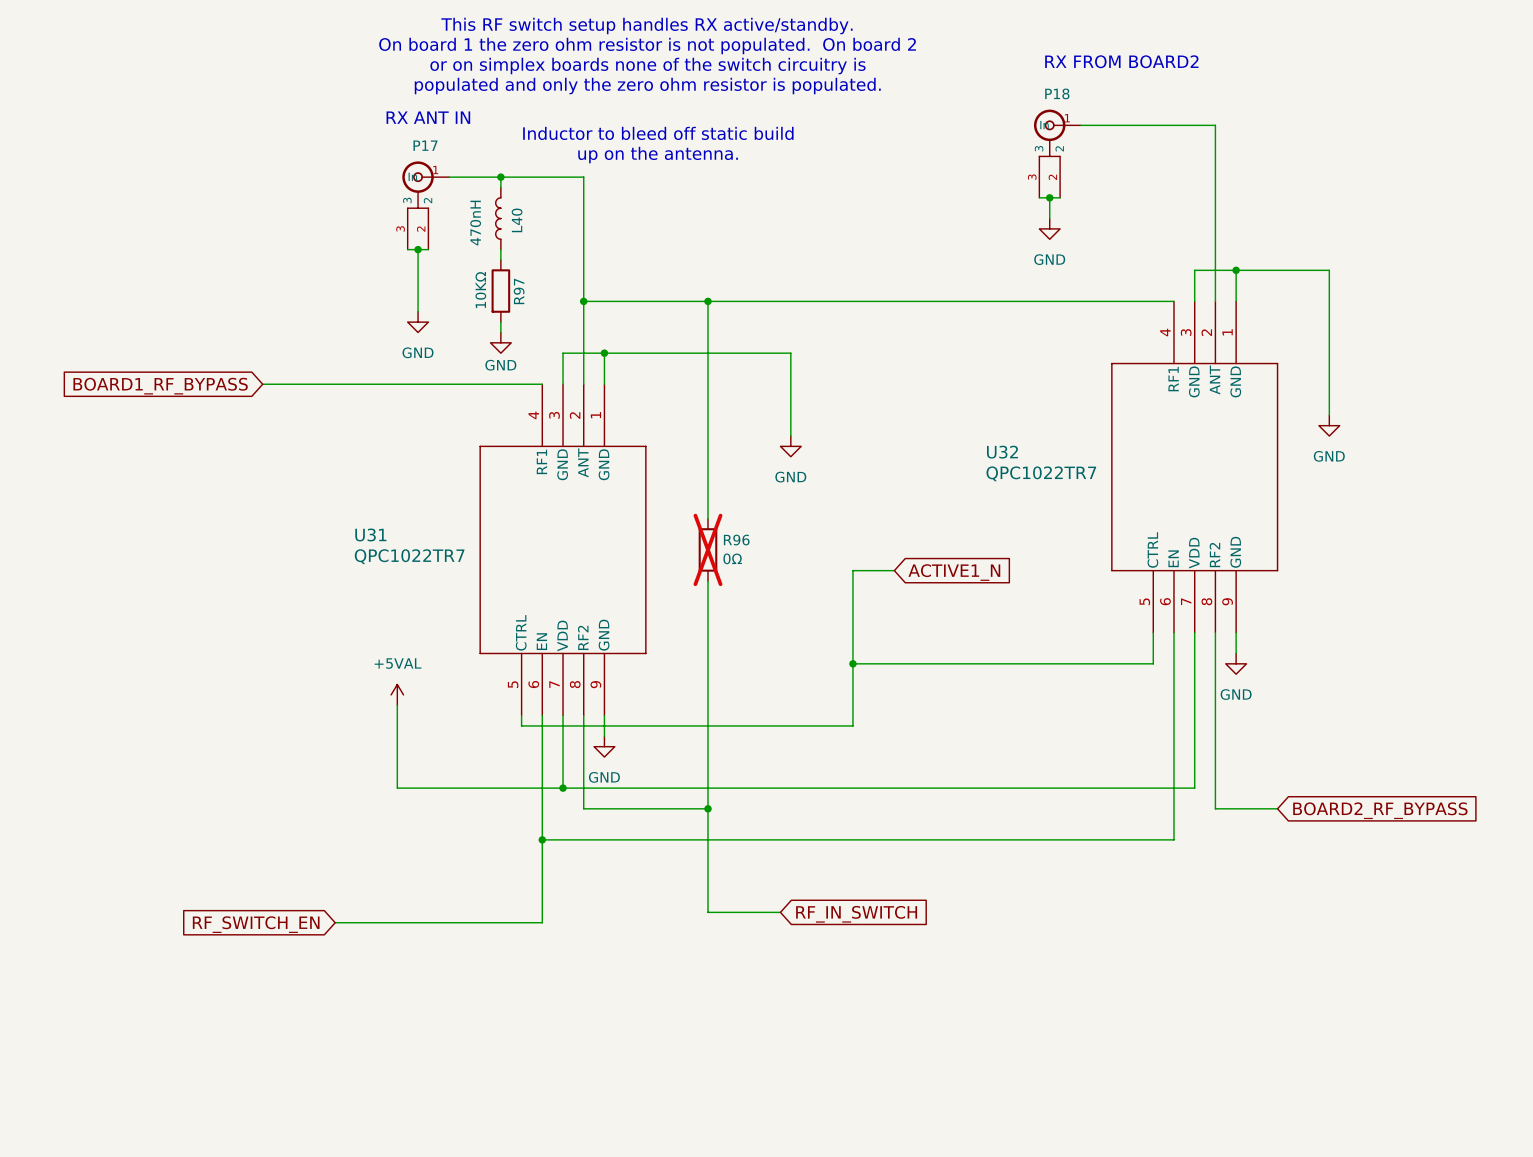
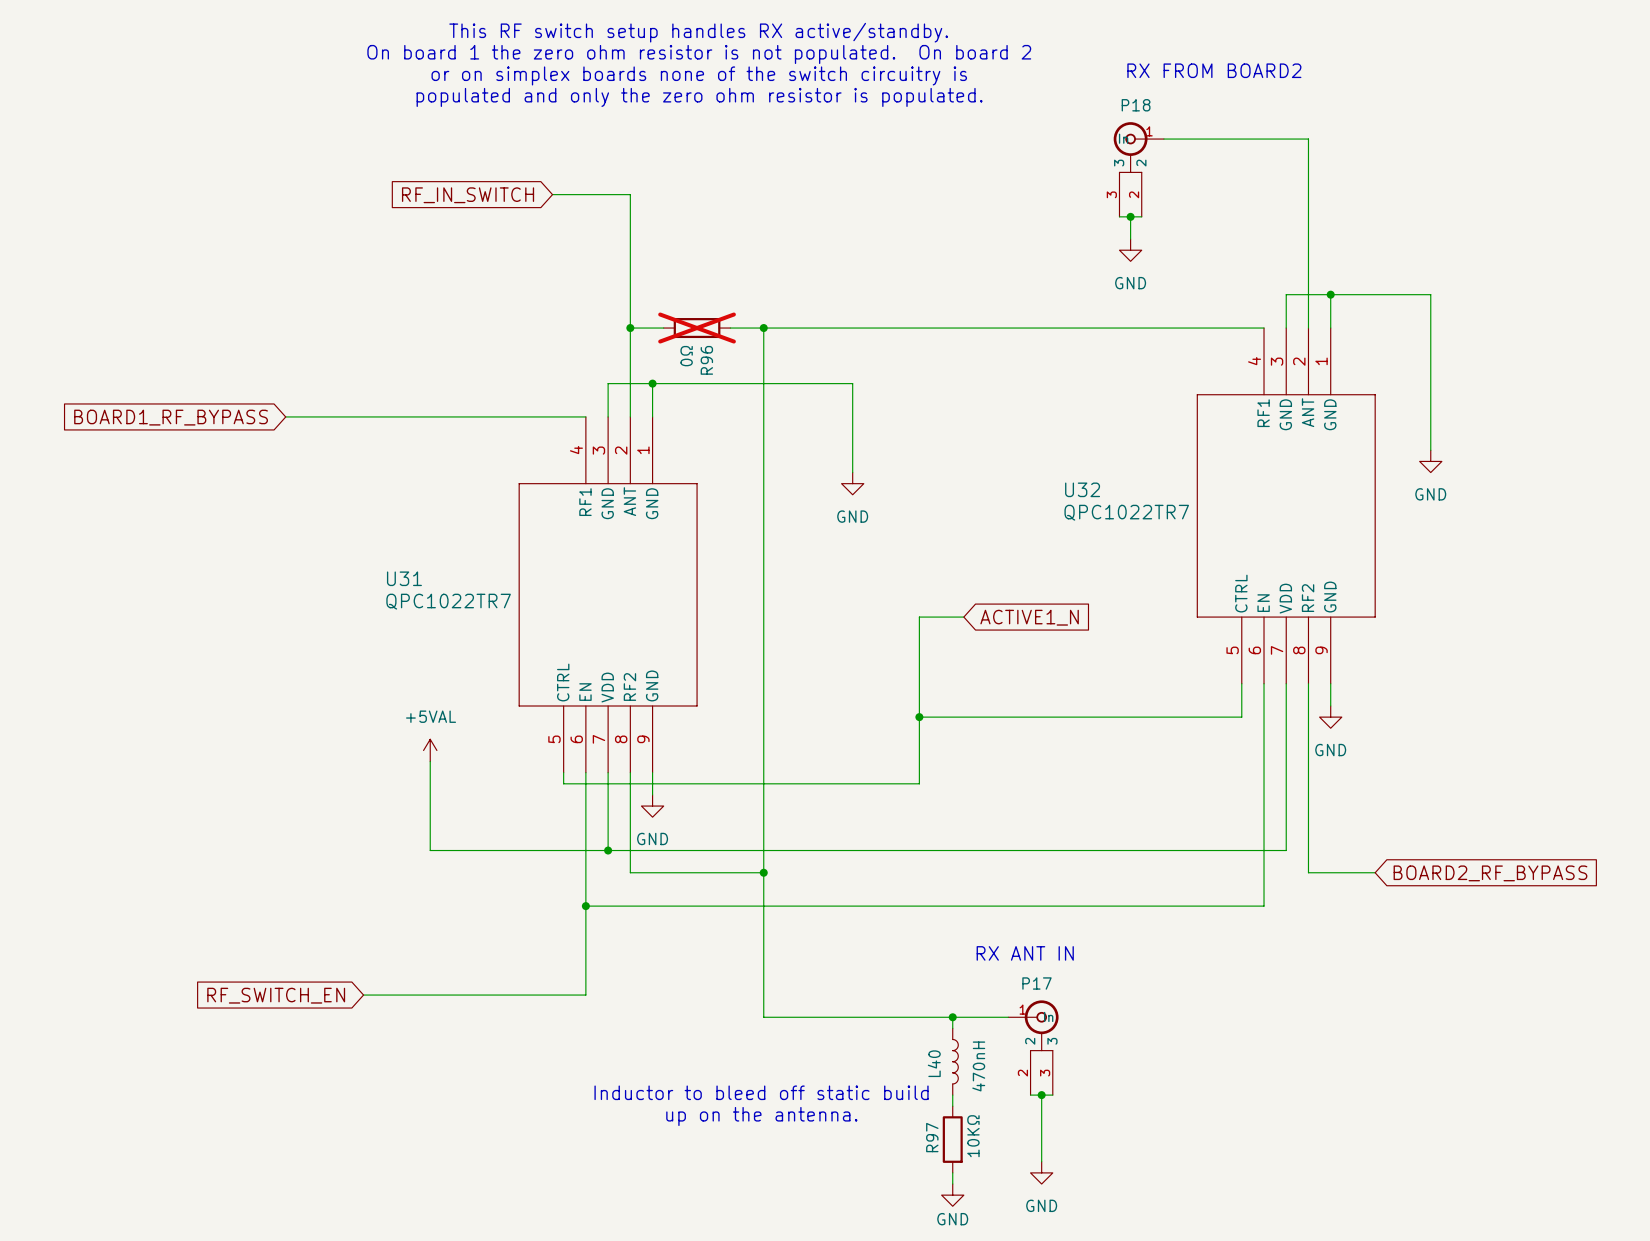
text: RX ANT IN (428, 117) -> none
text: Inductor to bleed off static build (658, 133) -> none
text: up on the antenna. (658, 155) -> none
wire: (449, 177) (511, 177) -> none
wire: (500, 177) (500, 187) -> none
junction: (500, 177) -> none
global label: none -> RF_IN_SWITCH (468, 195)
P17 flip: as is (418, 184) -> left-right (1041, 1025)
P17 position: (425, 205) -> (1033, 1047)
L40 rotation: 0° (498, 218) -> 180° (955, 1061)
L40 position: (498, 218) -> (955, 1061)
wire: (407, 249) (428, 249) -> none
wire: (418, 249) (418, 311) -> none
junction: (418, 249) -> none
wire: (500, 249) (500, 259) -> none
R97 value position: 10KΩ (480, 290) -> 10KΩ (973, 1136)
R97 position: (500, 291) -> (952, 1139)
R97 name position: R97 (519, 291) -> R97 (932, 1137)
power symbol: GND (418, 322) -> none
wire: (500, 322) (500, 332) -> none
power symbol: GND (500, 342) -> none
R96 rotation: 0° (707, 549) -> 90° clockwise (697, 328)
R96 position: (707, 549) -> (697, 328)
text: none -> RX ANT IN (1025, 953)
wire: (707, 912) (780, 912) -> (763, 983) (763, 1017) (1008, 1017)
global label: RF_IN_SWITCH (856, 914) -> none
wire: none -> (952, 1017) (952, 1028)
junction: none -> (952, 1017)
text: none -> Inductor to bleed off static build (761, 1092)
wire: none -> (952, 1095) (952, 1106)
wire: none -> (1030, 1095) (1052, 1095)
wire: none -> (1041, 1095) (1041, 1161)
junction: none -> (1041, 1095)
text: none -> up on the antenna. (761, 1116)
wire: none -> (952, 1172) (952, 1184)
power symbol: none -> GND (1041, 1172)
power symbol: none -> GND (952, 1195)

